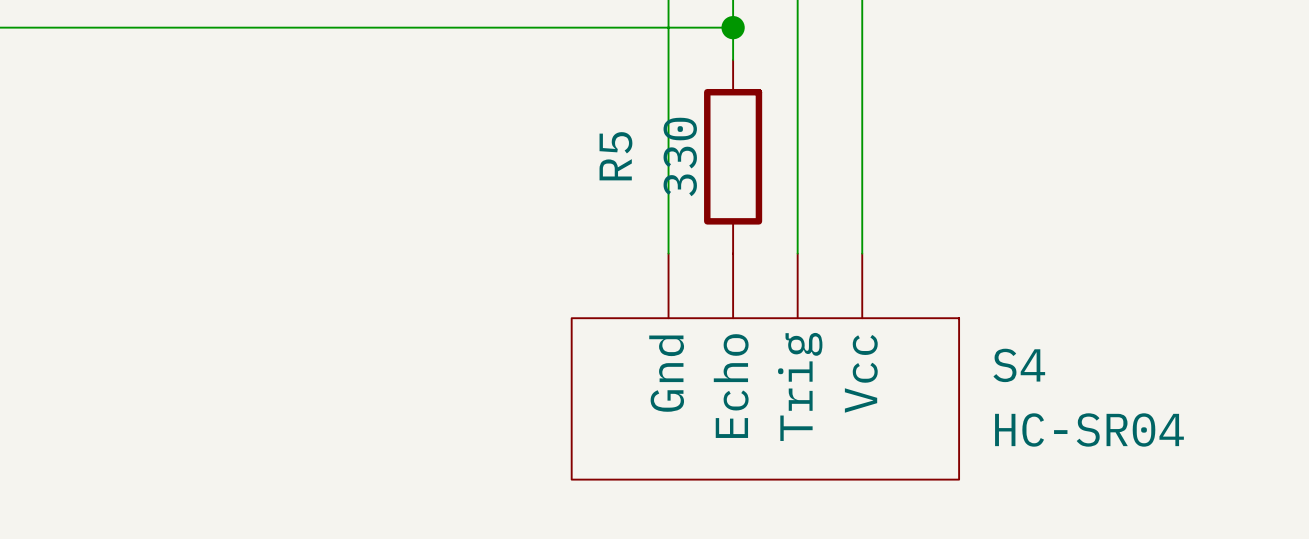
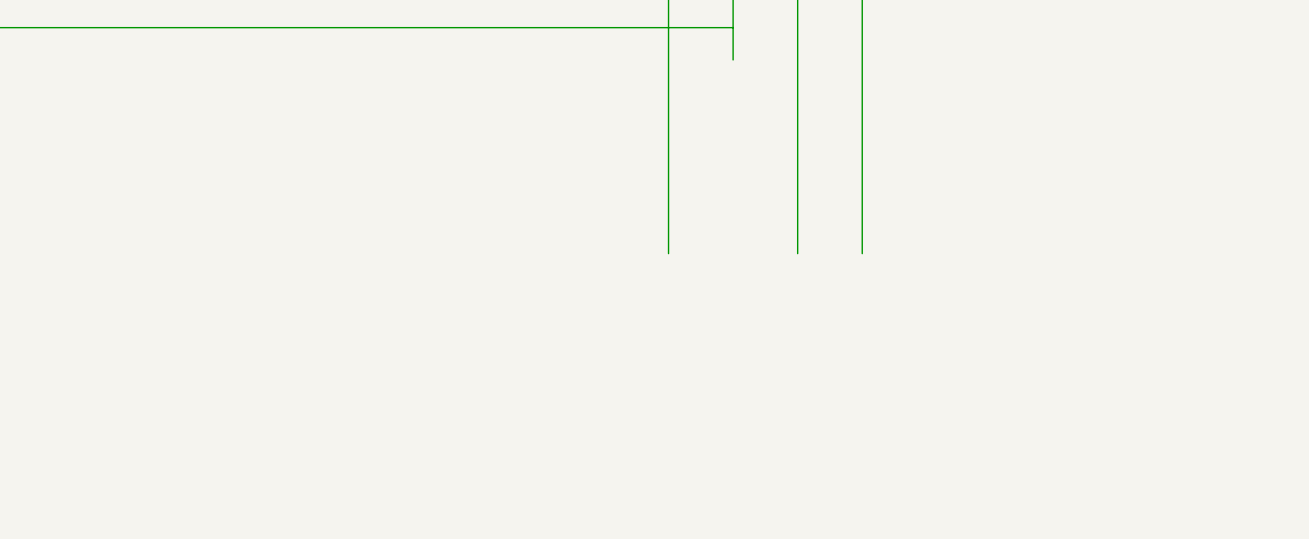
junction: (733, 27) -> none
R5: 330 (733, 156) -> none
S4: HC-SR04 (765, 366) -> none

